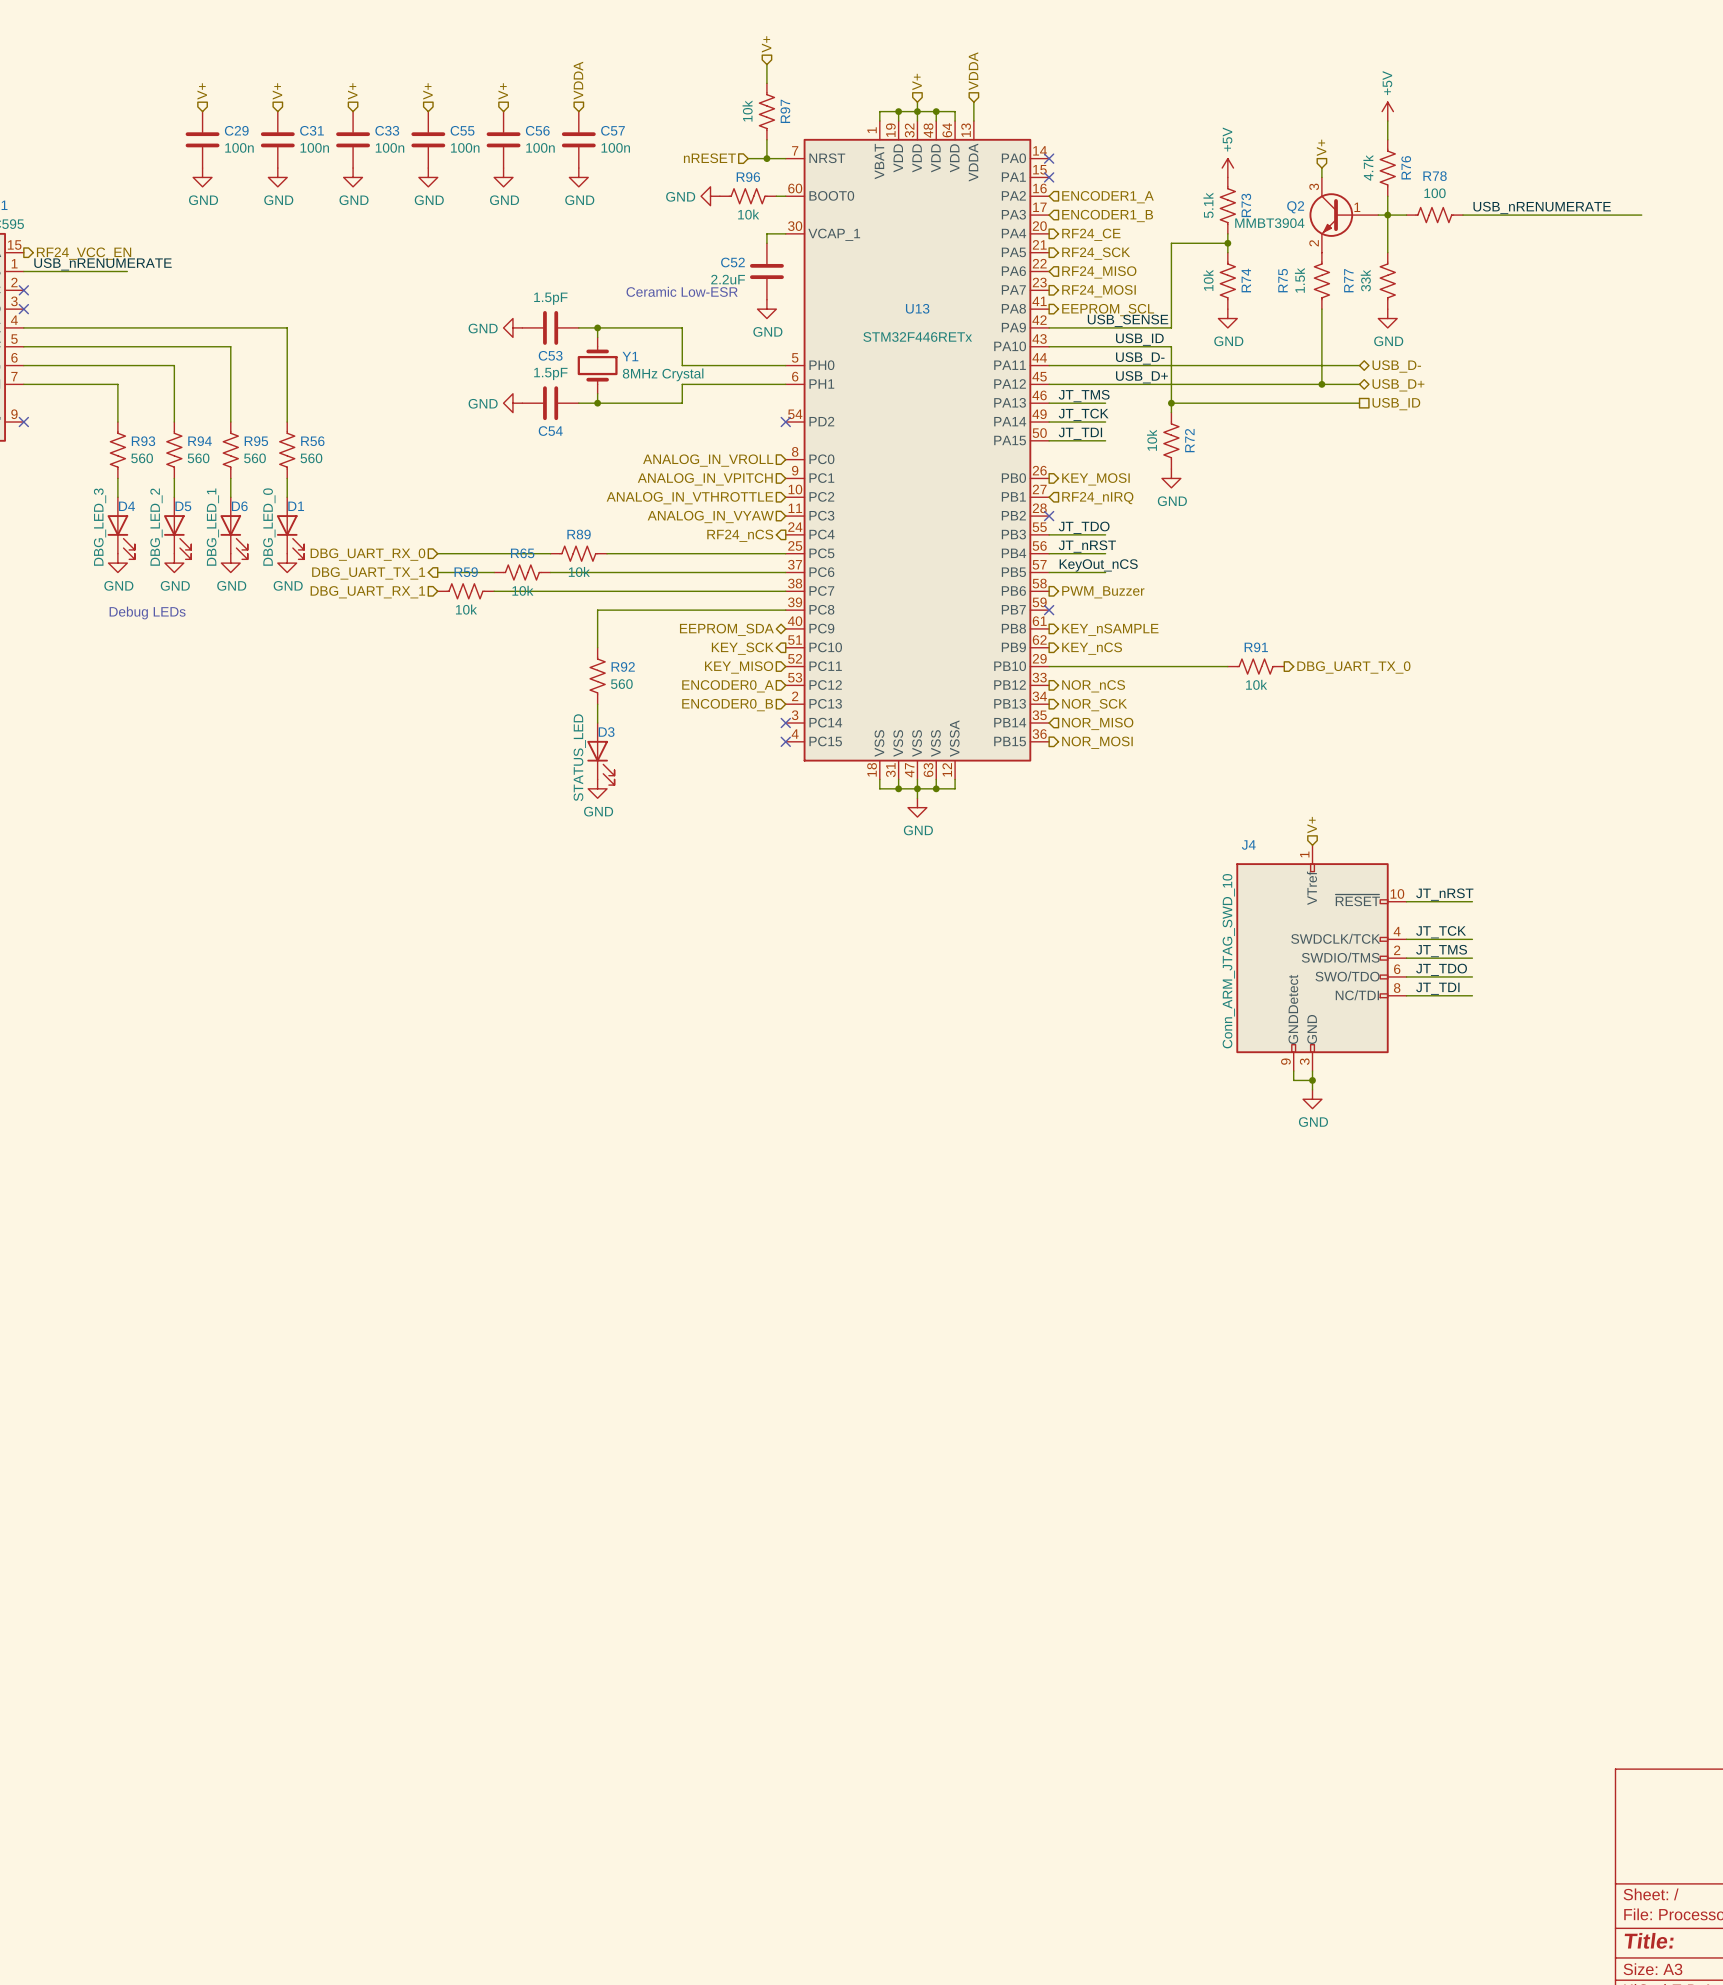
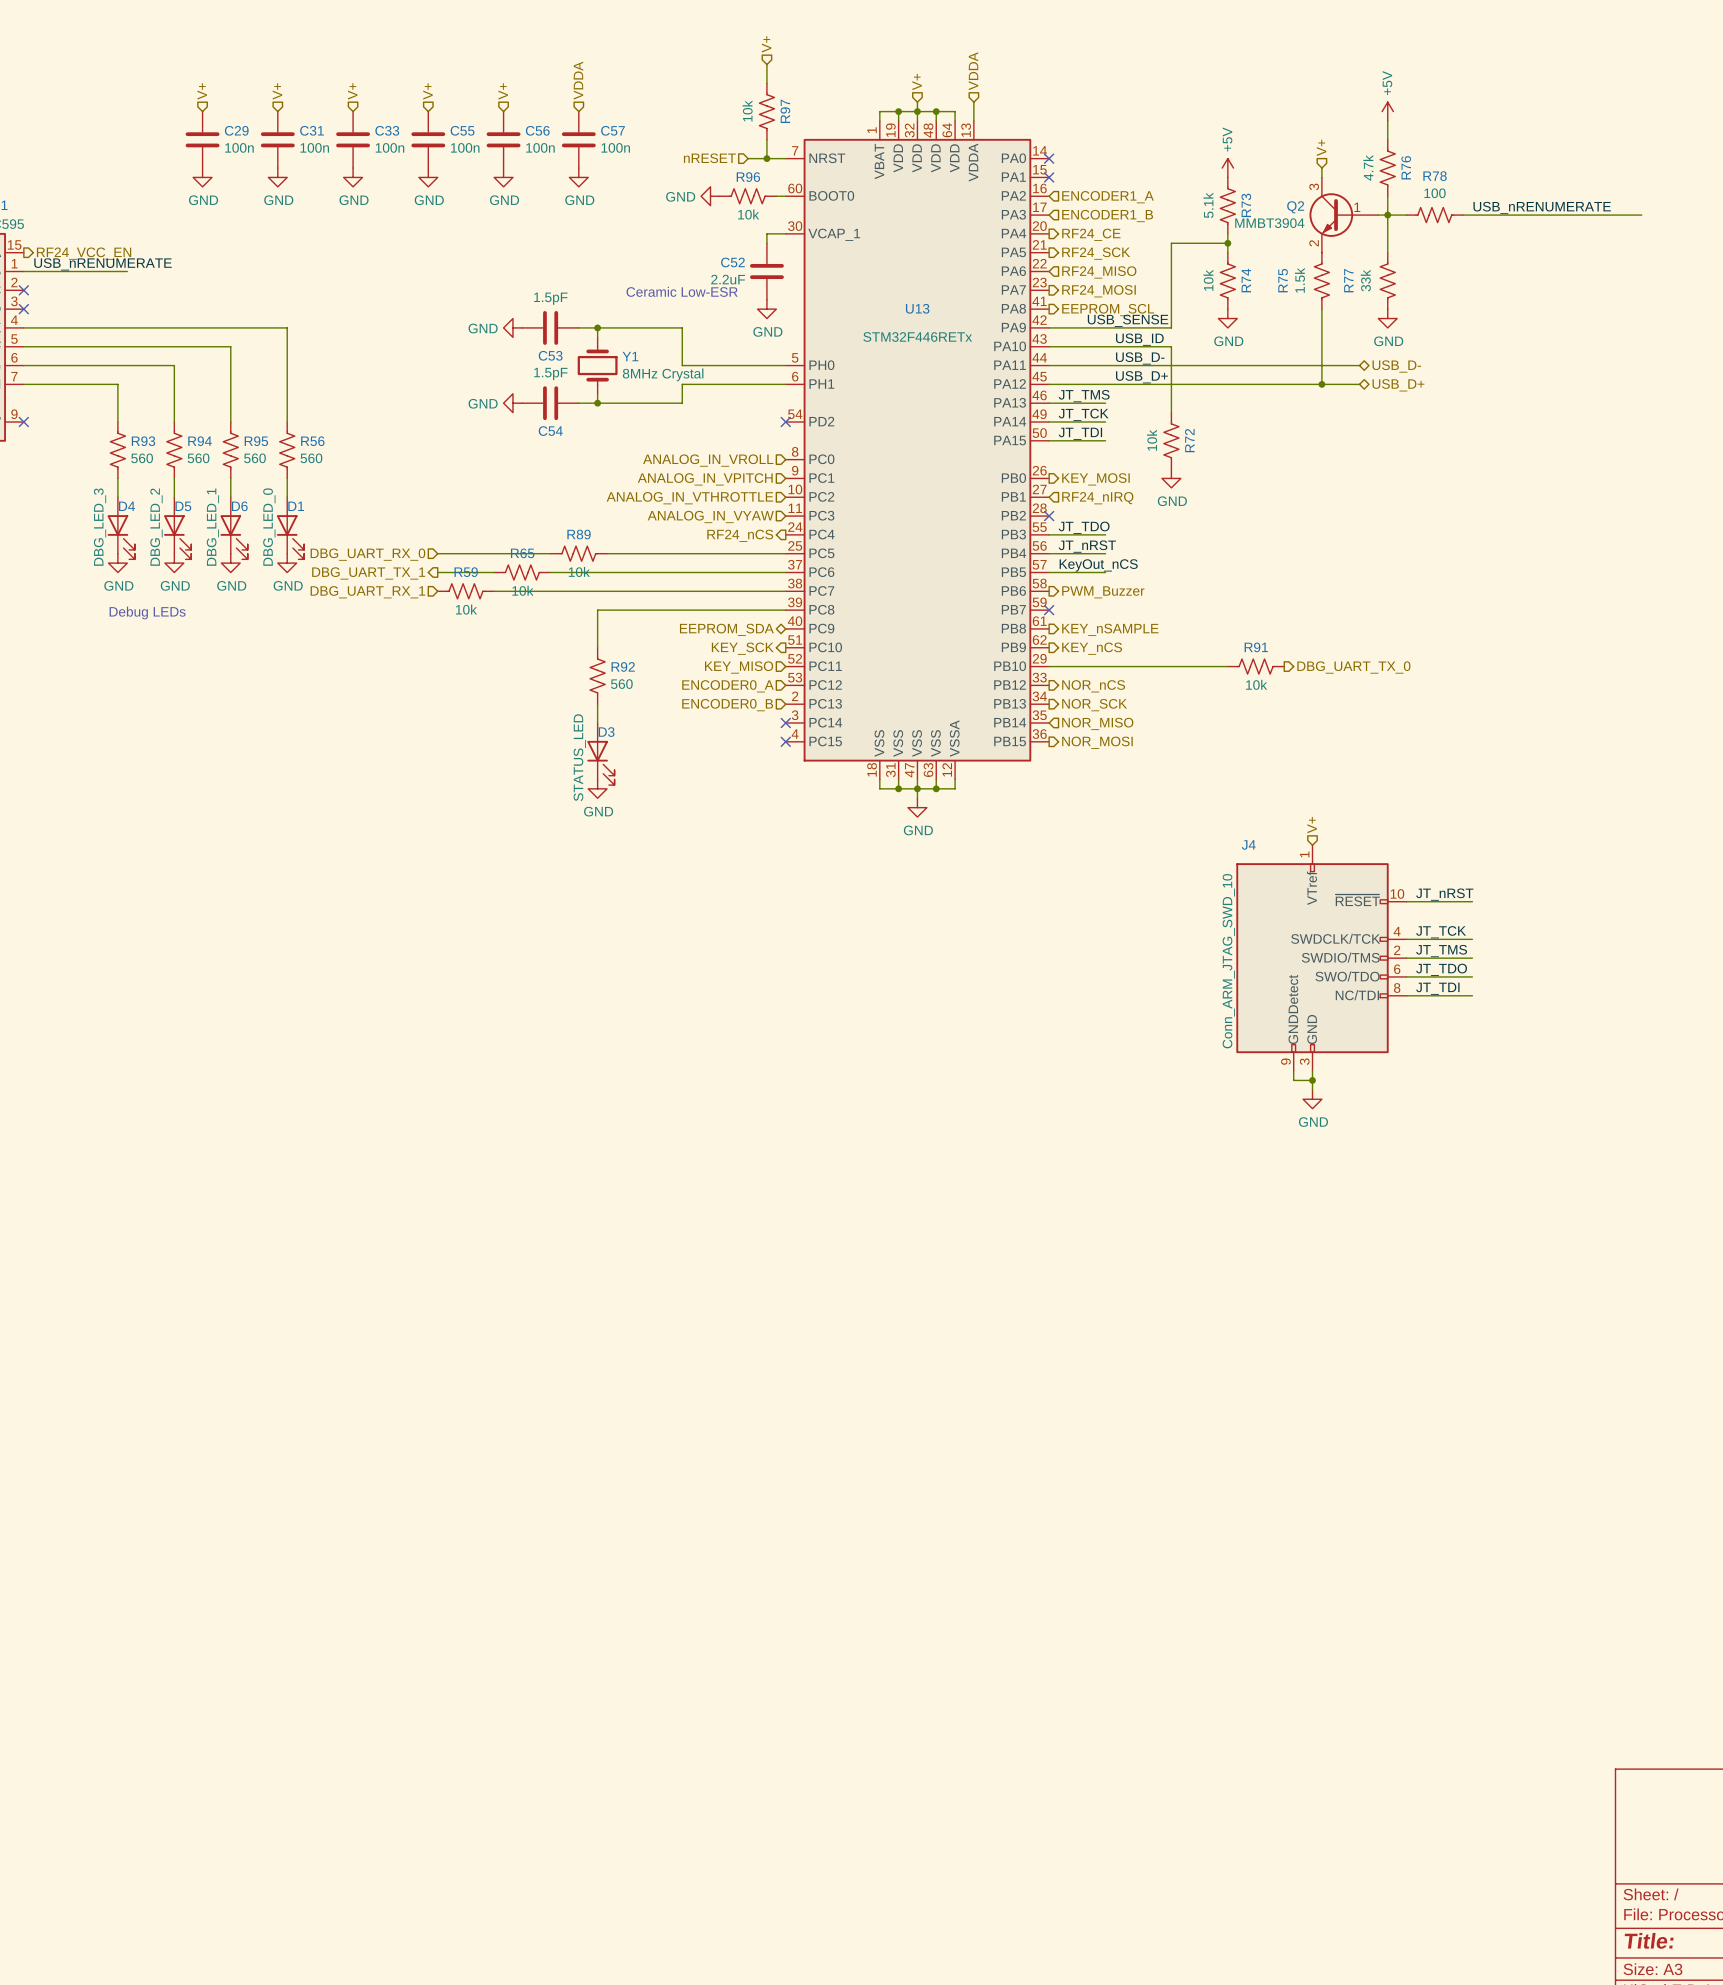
wire: (1171, 403) (1359, 403) -> none
junction: (1171, 403) -> none
hierarchical label: USB_ID (1396, 404) -> none

